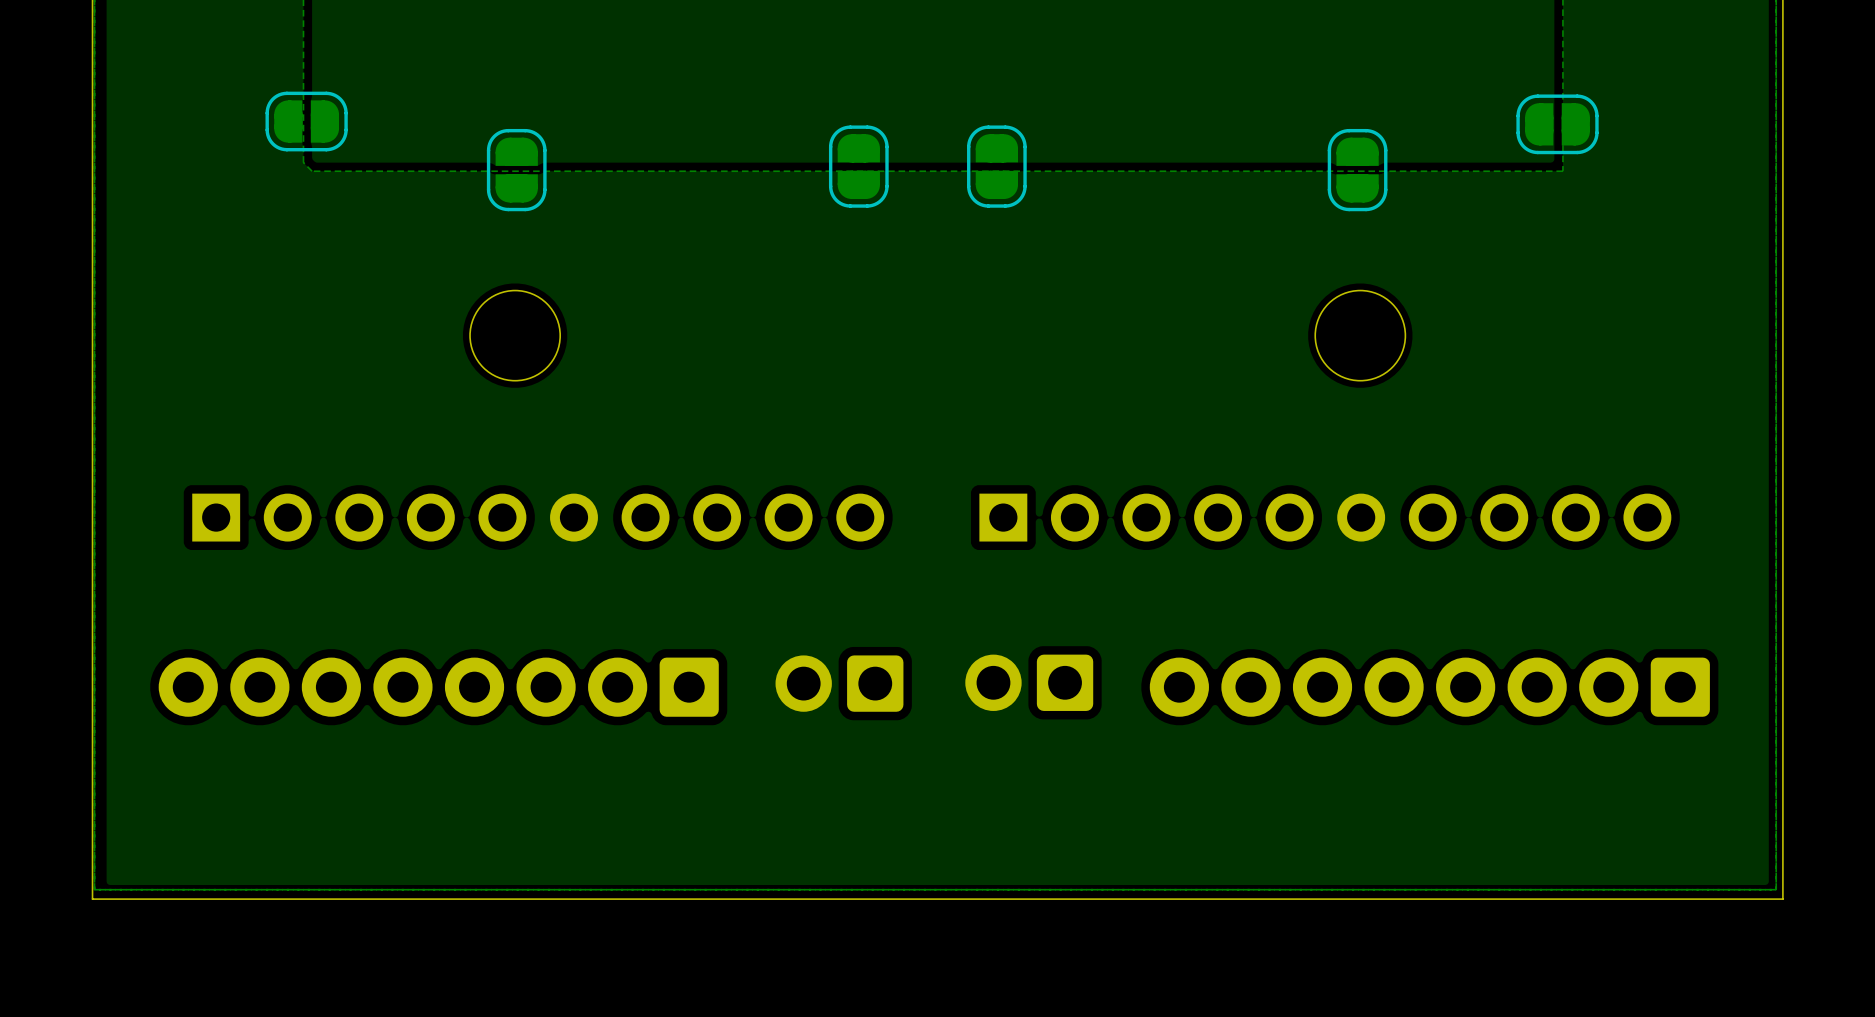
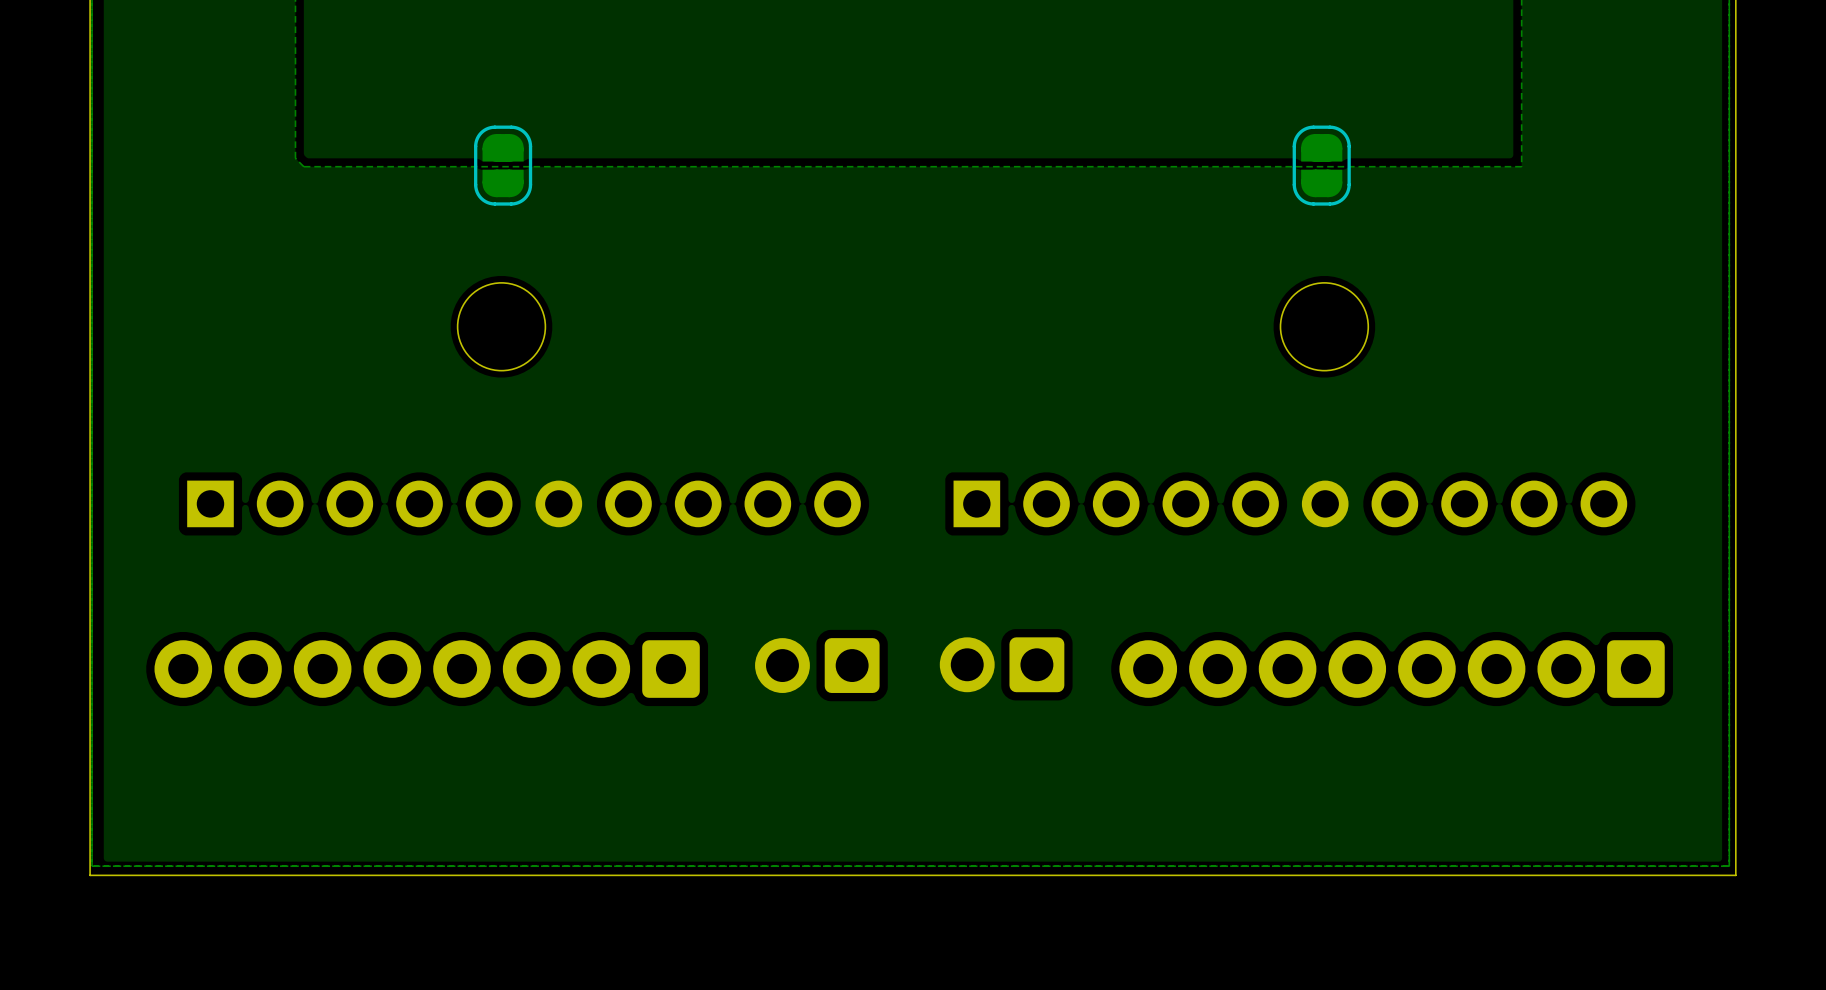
part: (306, 121) -> none
part: (1557, 124) -> none
part: (858, 166) -> none
part: (996, 166) -> none

